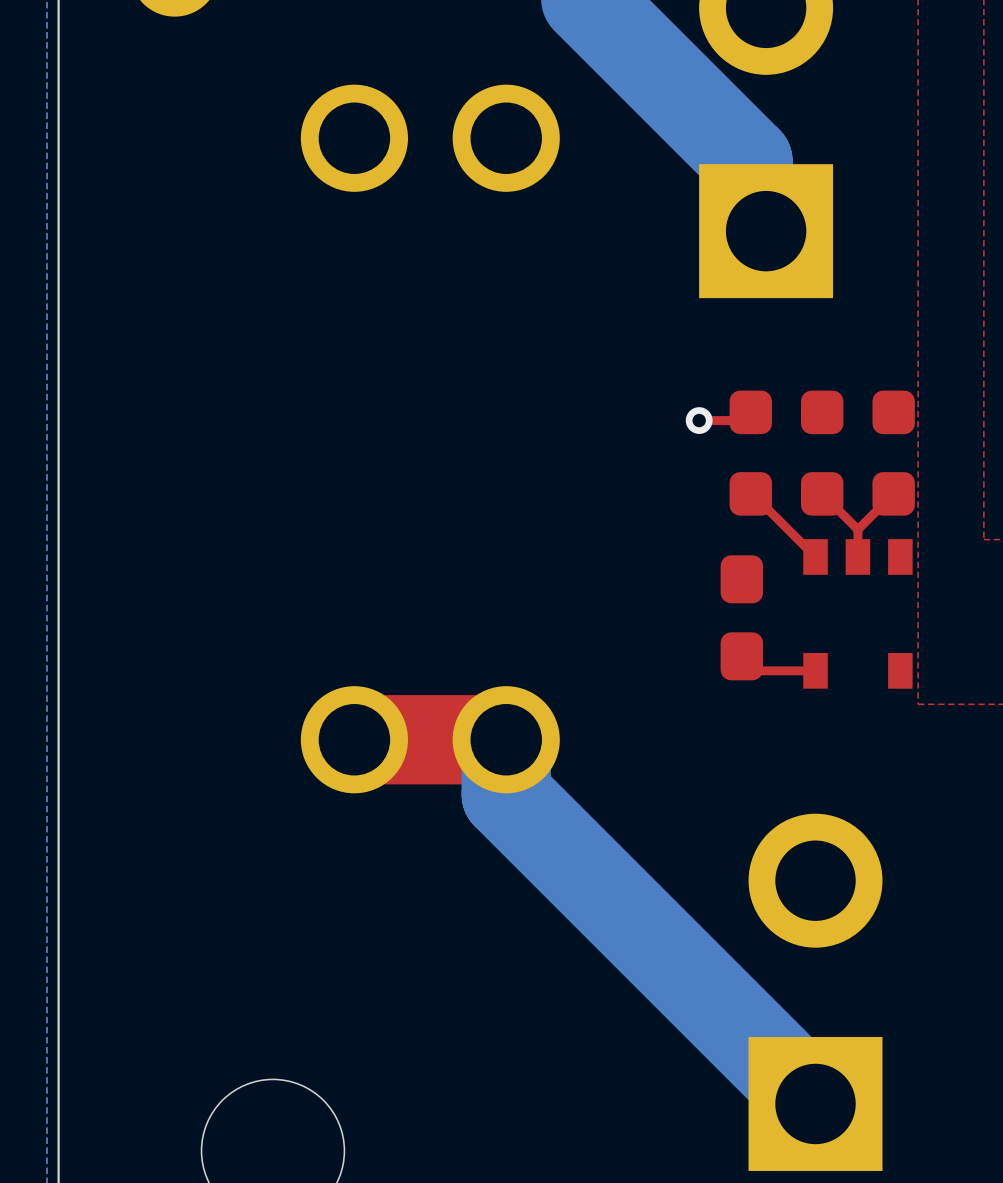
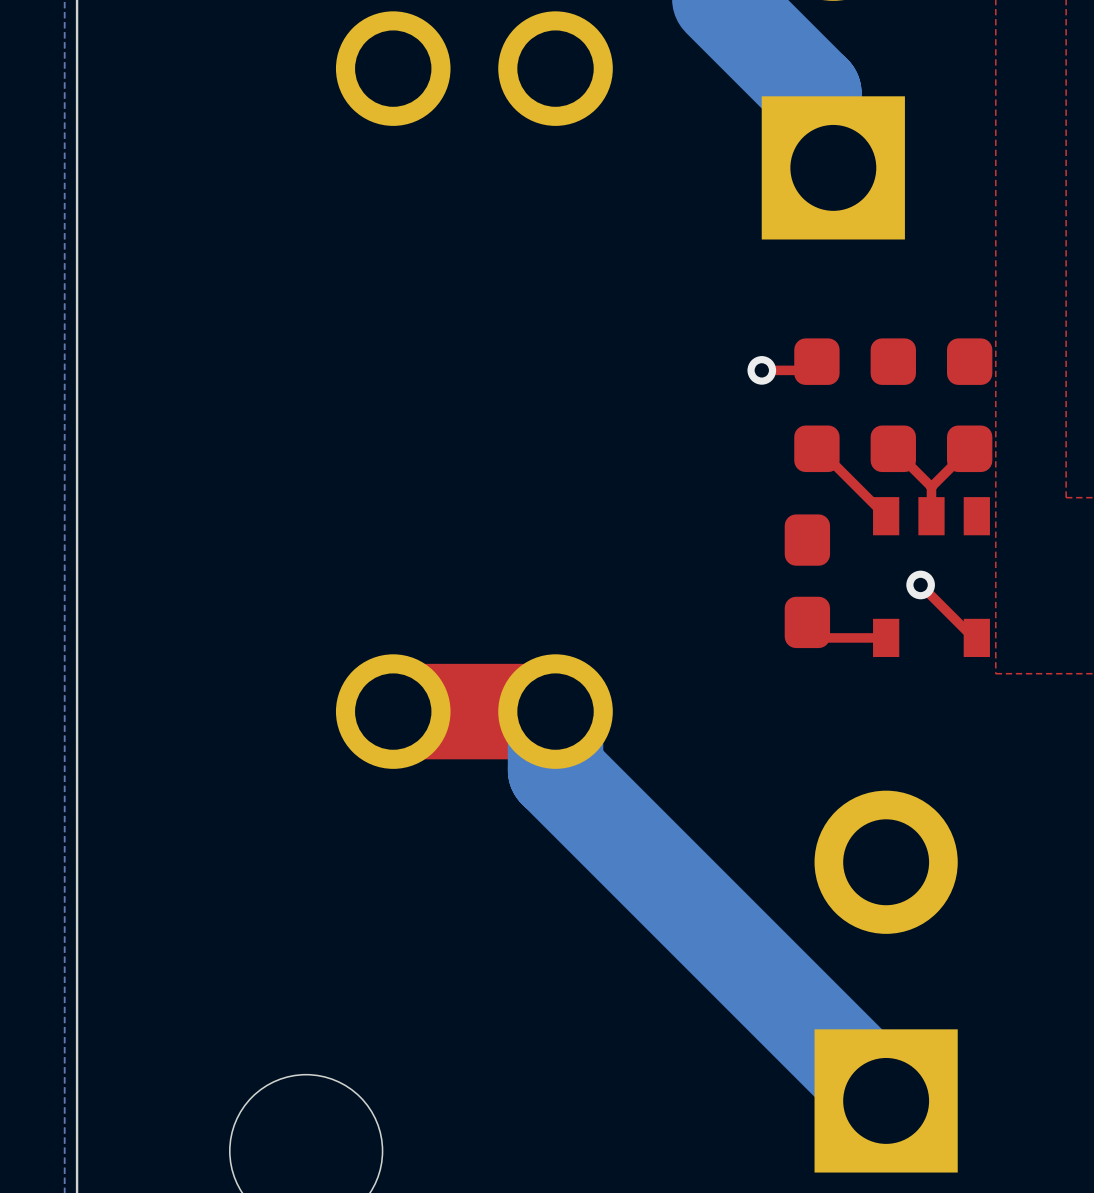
top track: none -> (920, 584) (978, 642) (981, 642)
via: none -> (920, 584)

